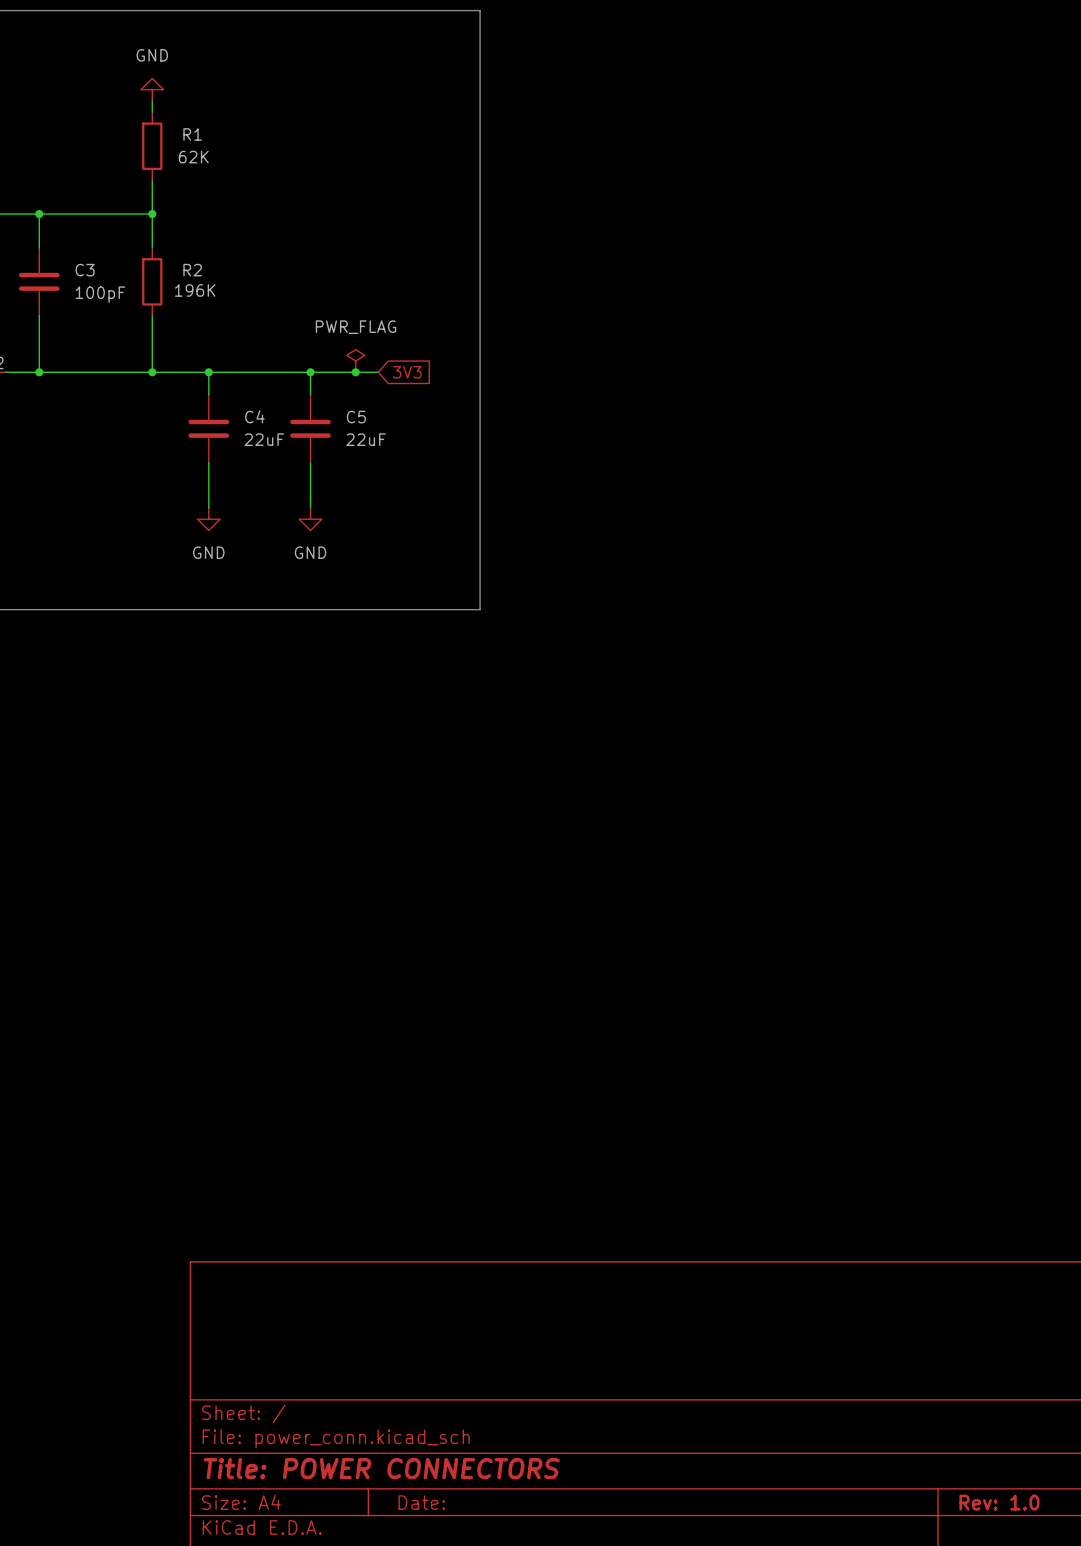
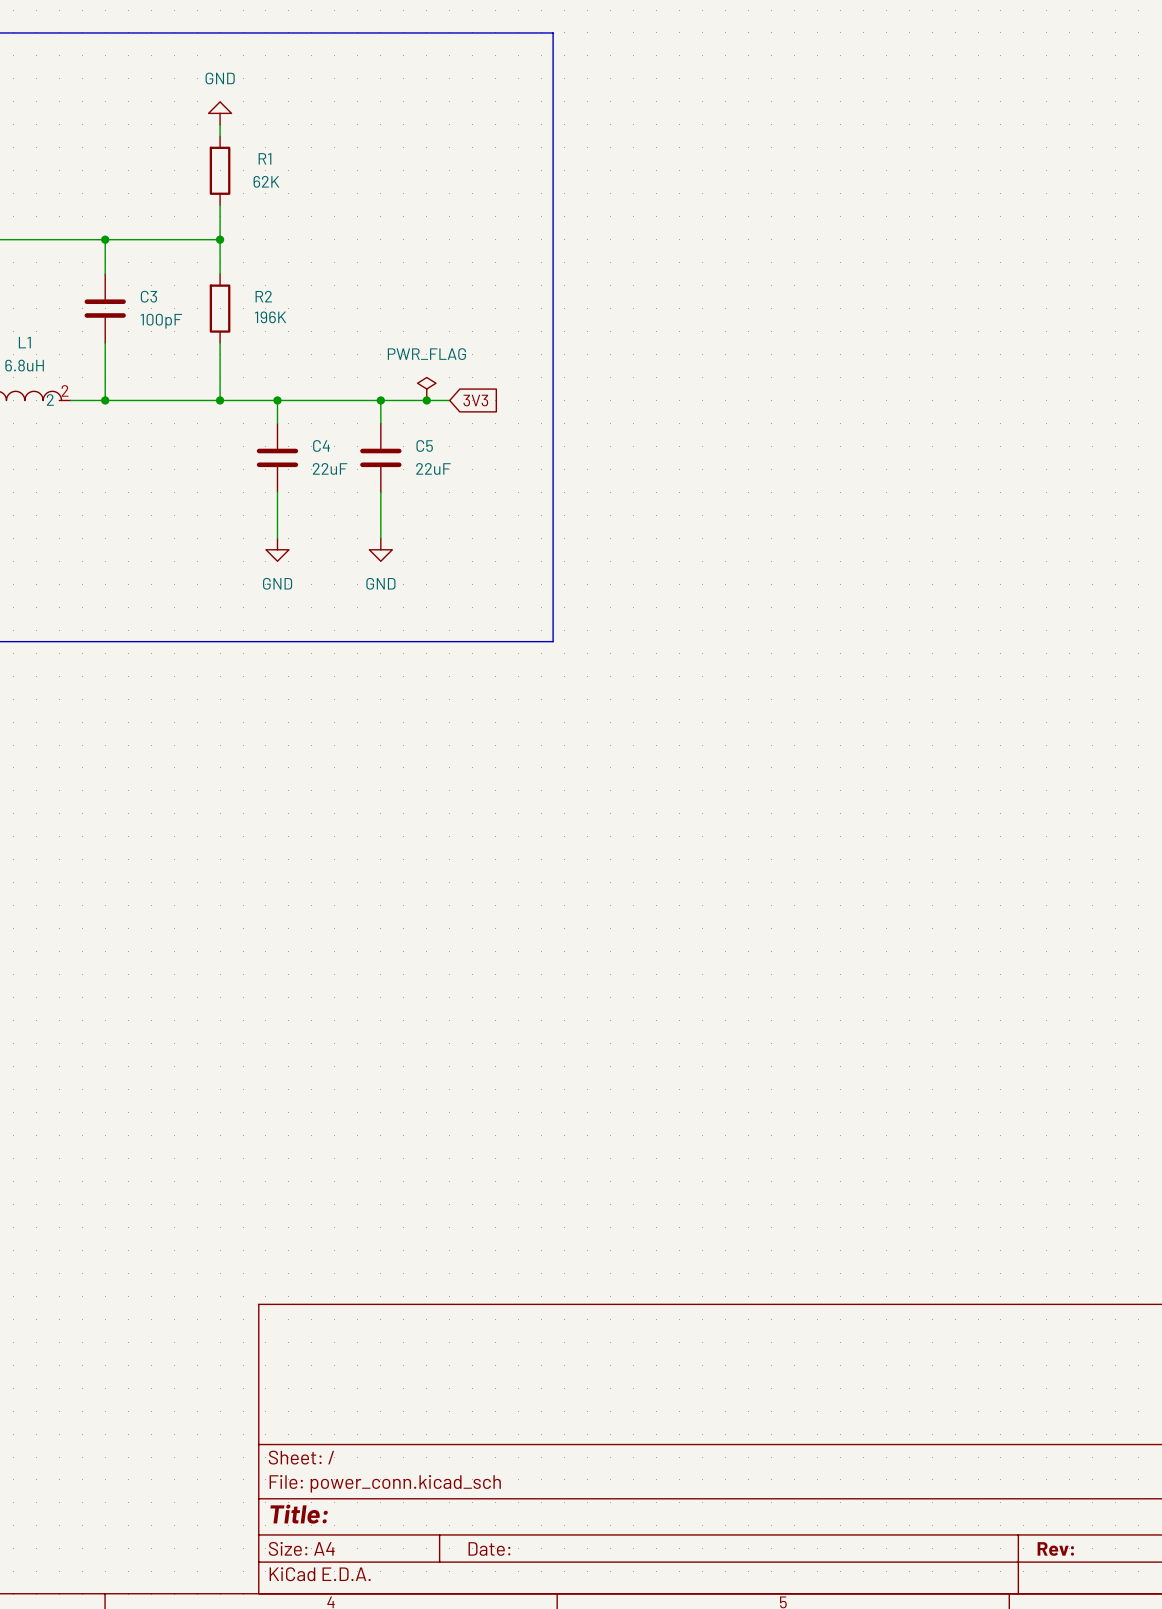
title block: Title: POWER CONNECTORS (381, 1468) -> Title: (299, 1514)
title block: Rev: 1.0 (999, 1502) -> Rev: (1055, 1549)

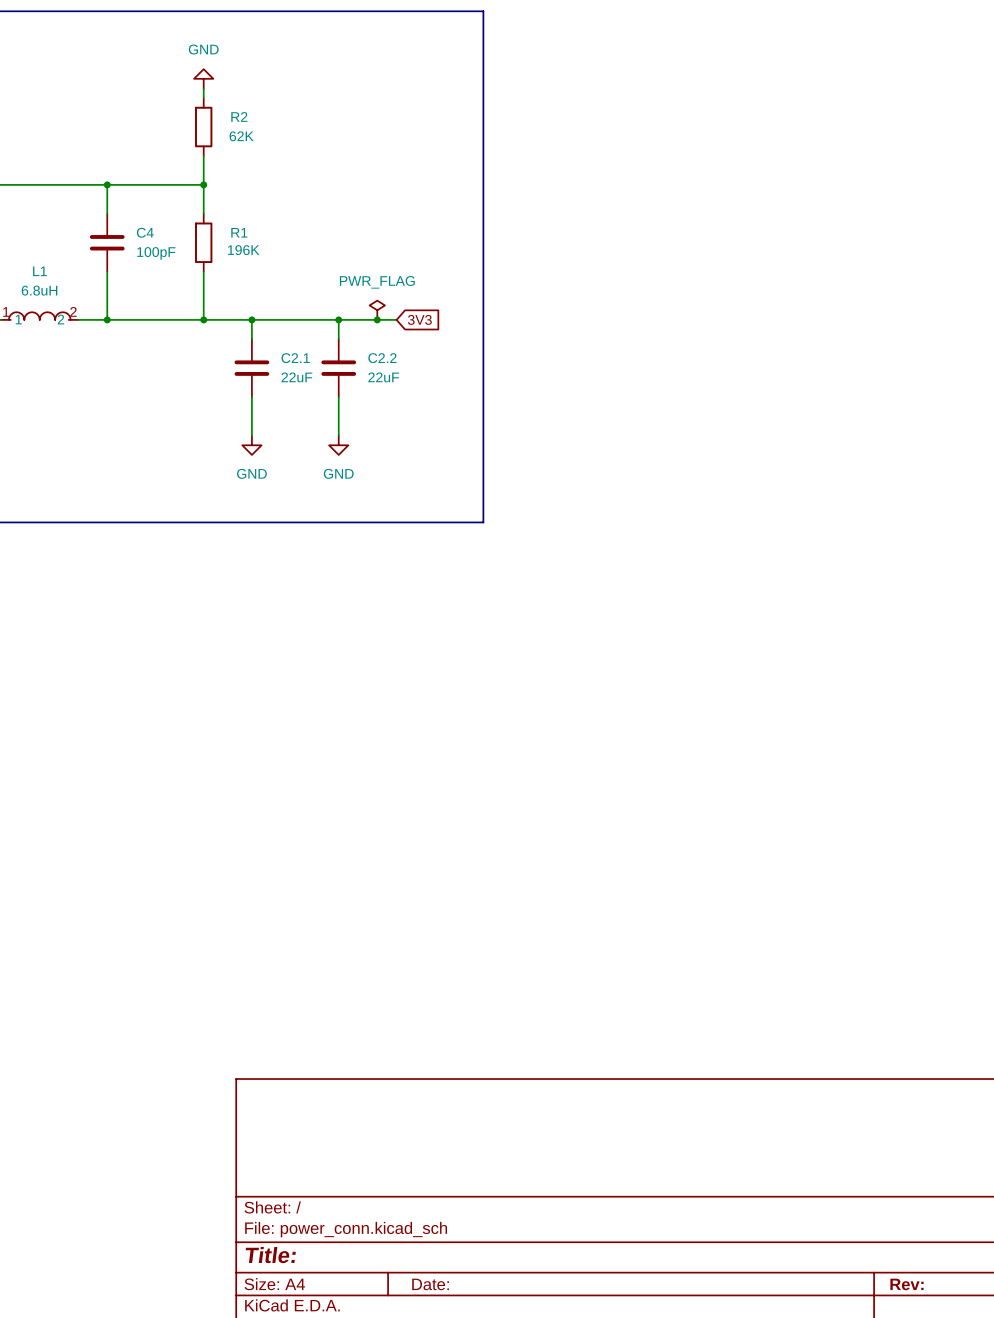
R1 name: R1 (265, 158) -> R2 (239, 116)
C3 name: C3 (148, 296) -> C4 (145, 232)
R2 name: R2 (263, 296) -> R1 (239, 232)
C4 name: C4 (321, 445) -> C2.1 (295, 358)
C5 name: C5 (424, 445) -> C2.2 (382, 358)

